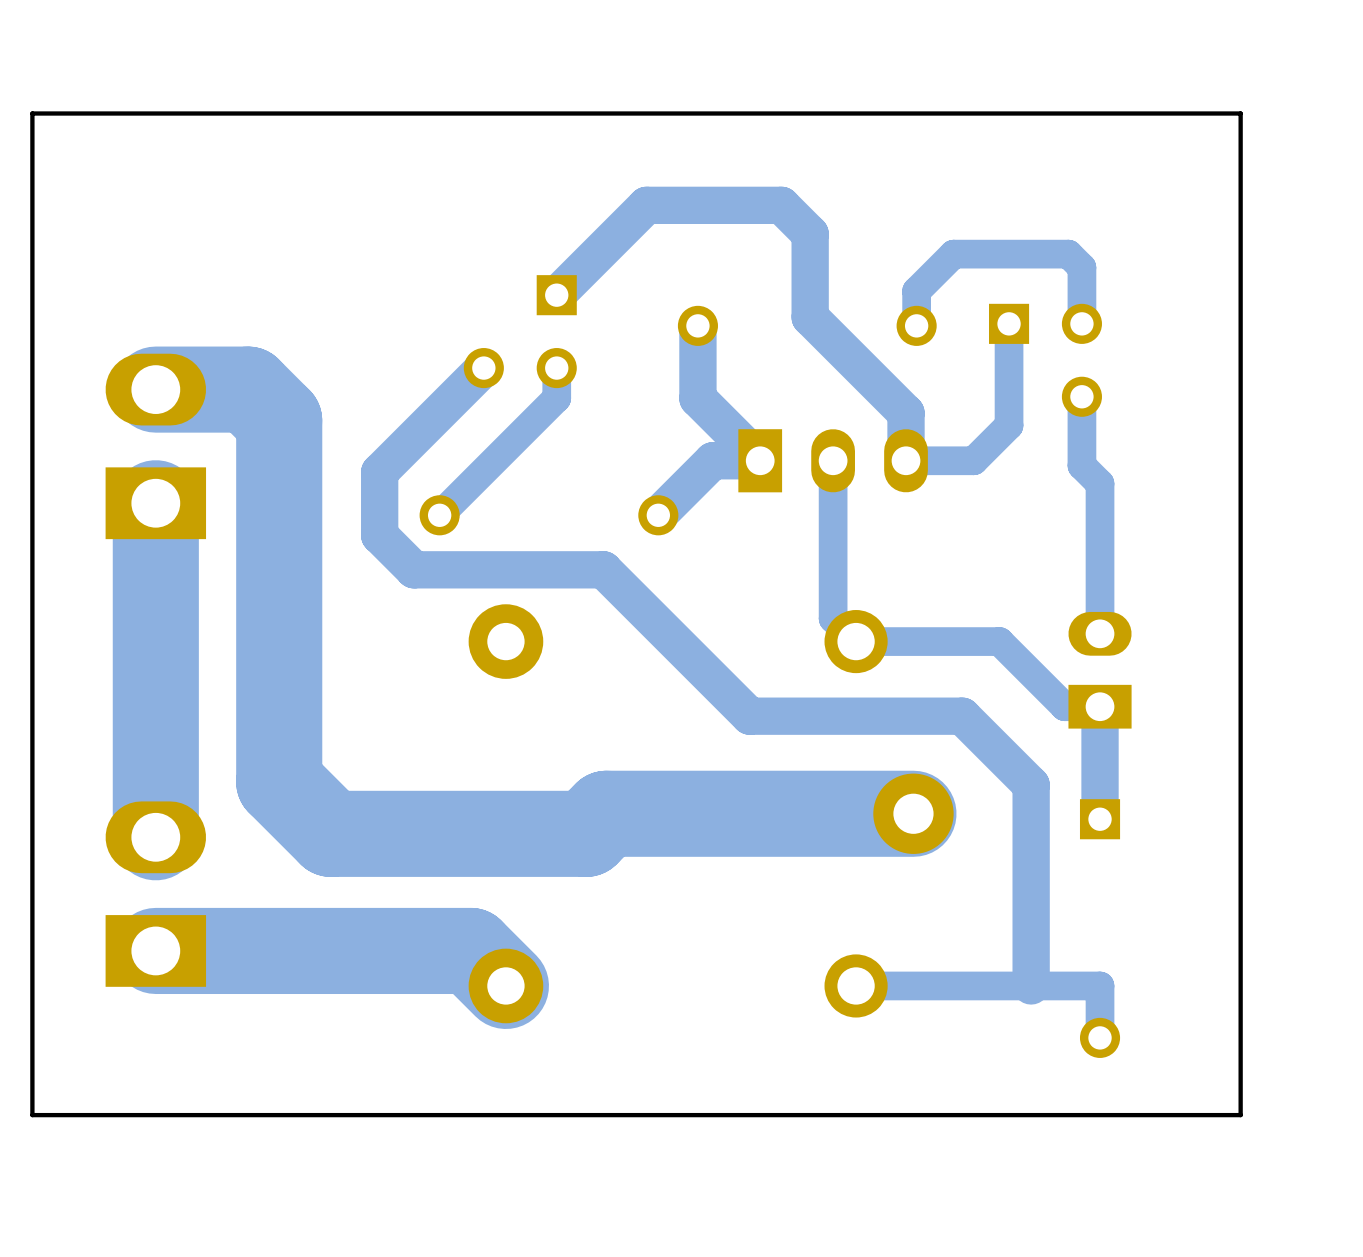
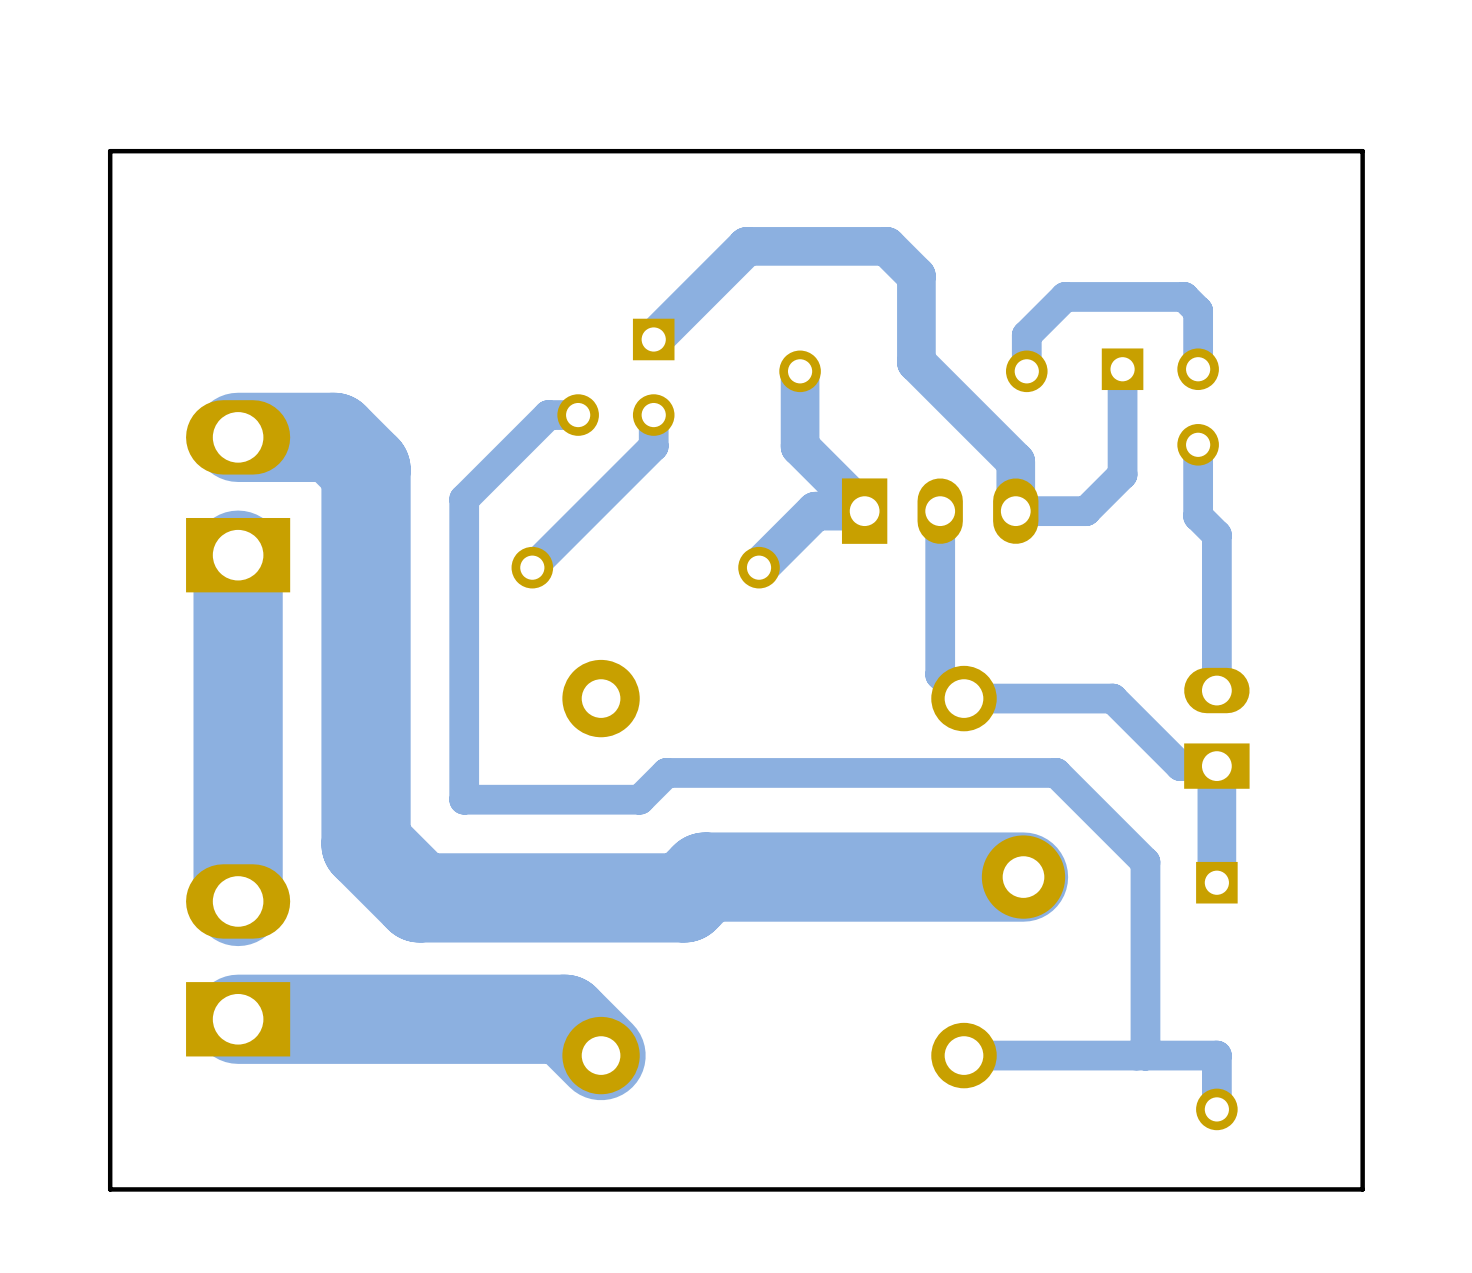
track: (483, 368) (379, 472) (379, 535) (414, 569) (603, 569) (749, 716) (962, 716) (1031, 785) (1031, 799) -> (578, 415) (548, 415) (464, 499) (464, 799) (639, 799) (666, 772) (1056, 772) (1145, 862)
track width: thick (1031, 799) (1031, 985) -> thin (1145, 862) (1145, 1055)

